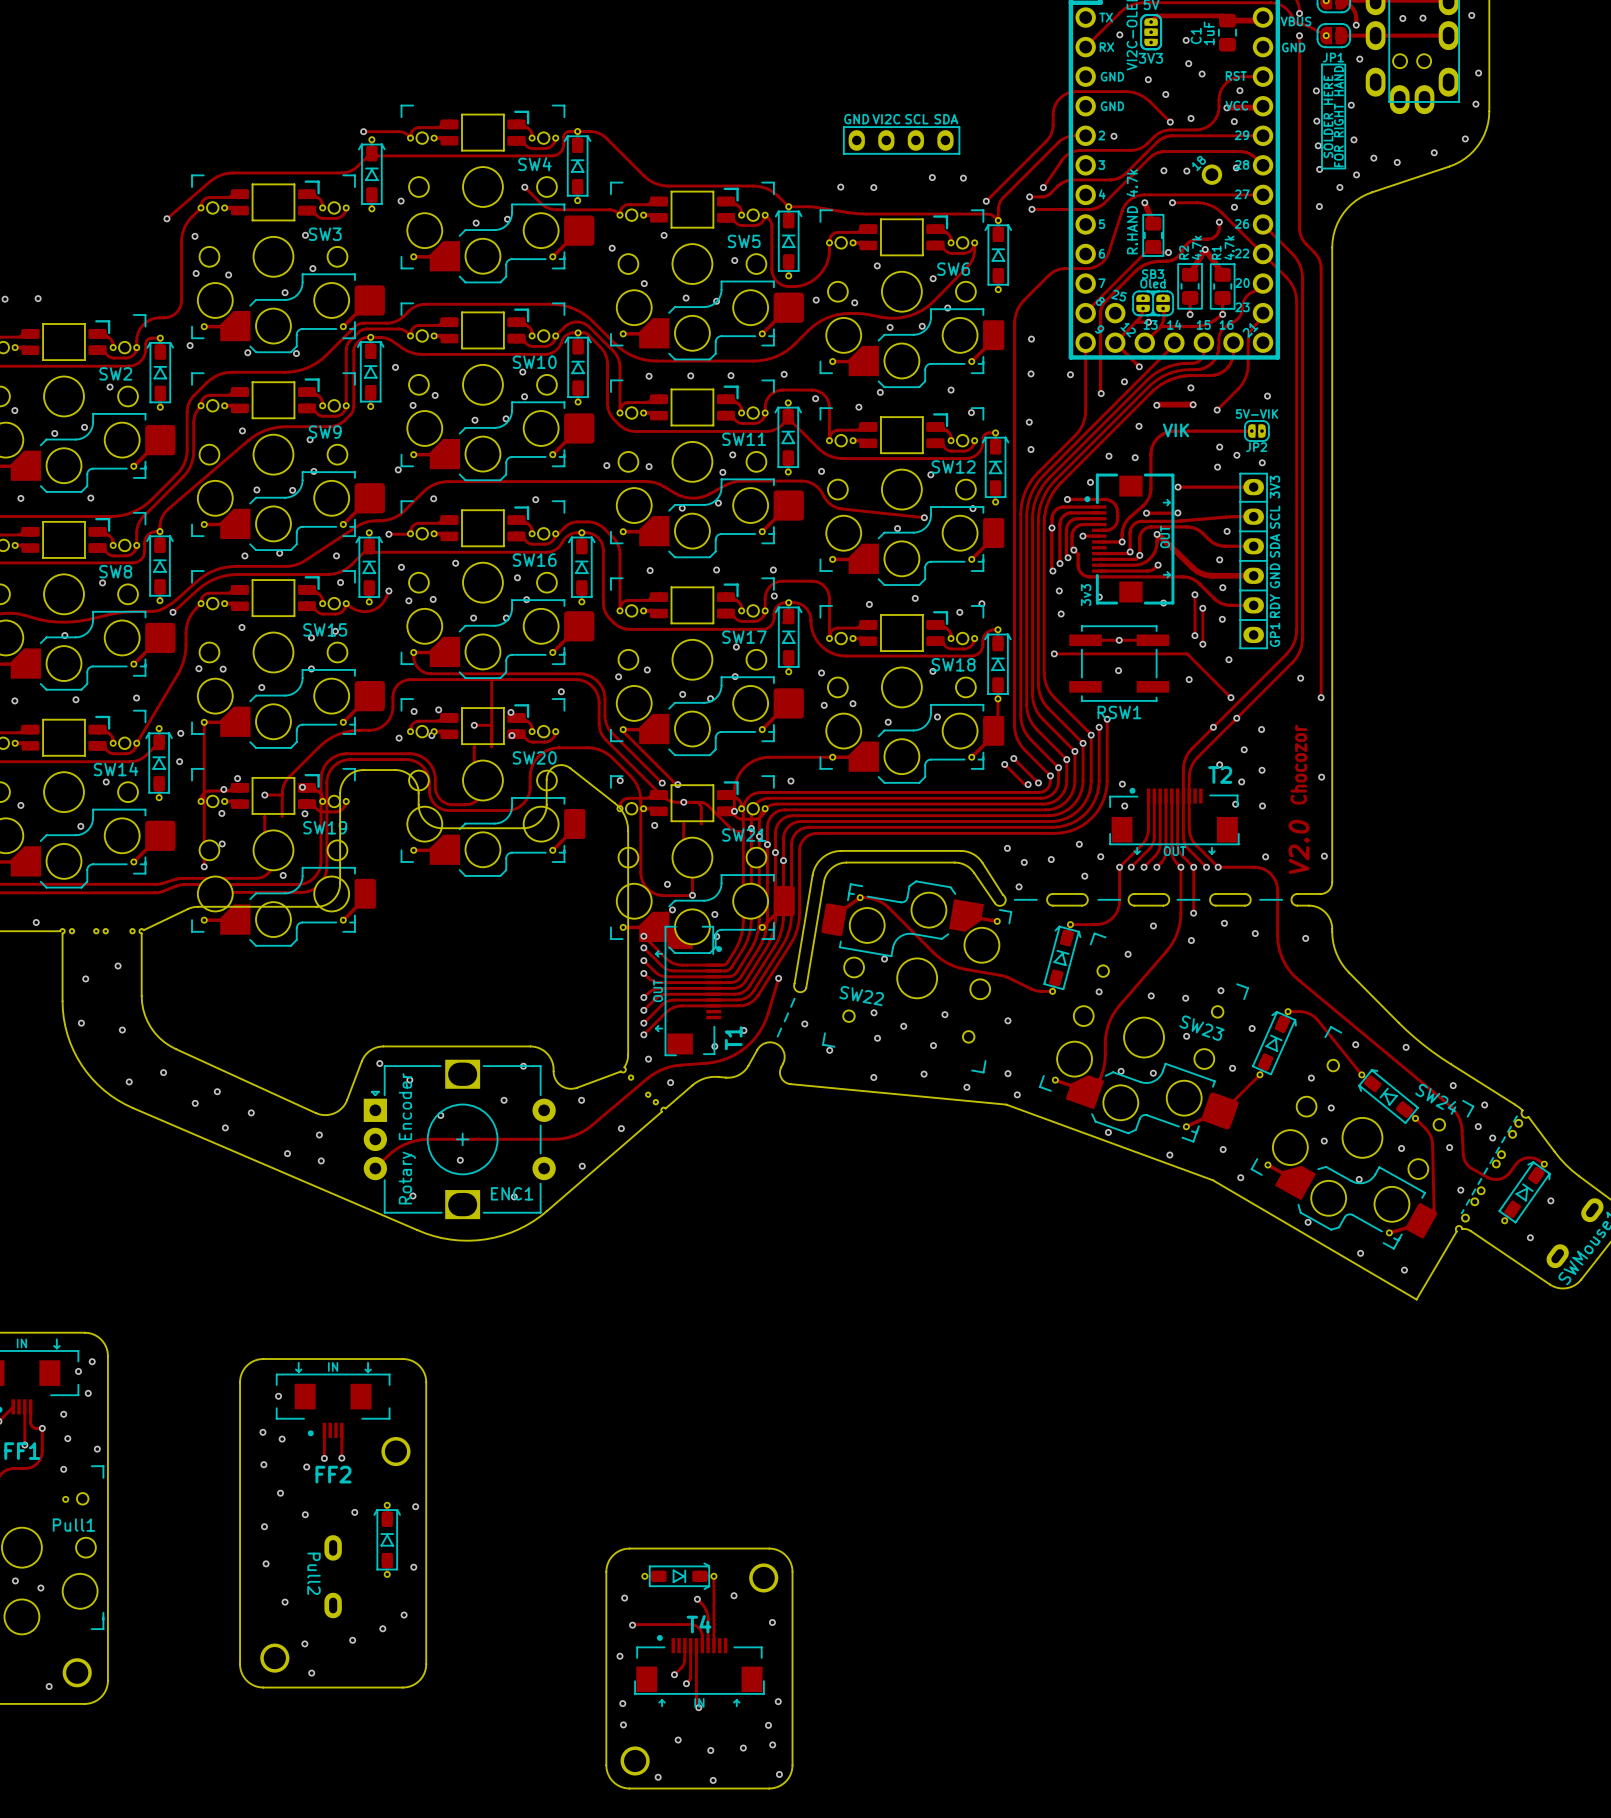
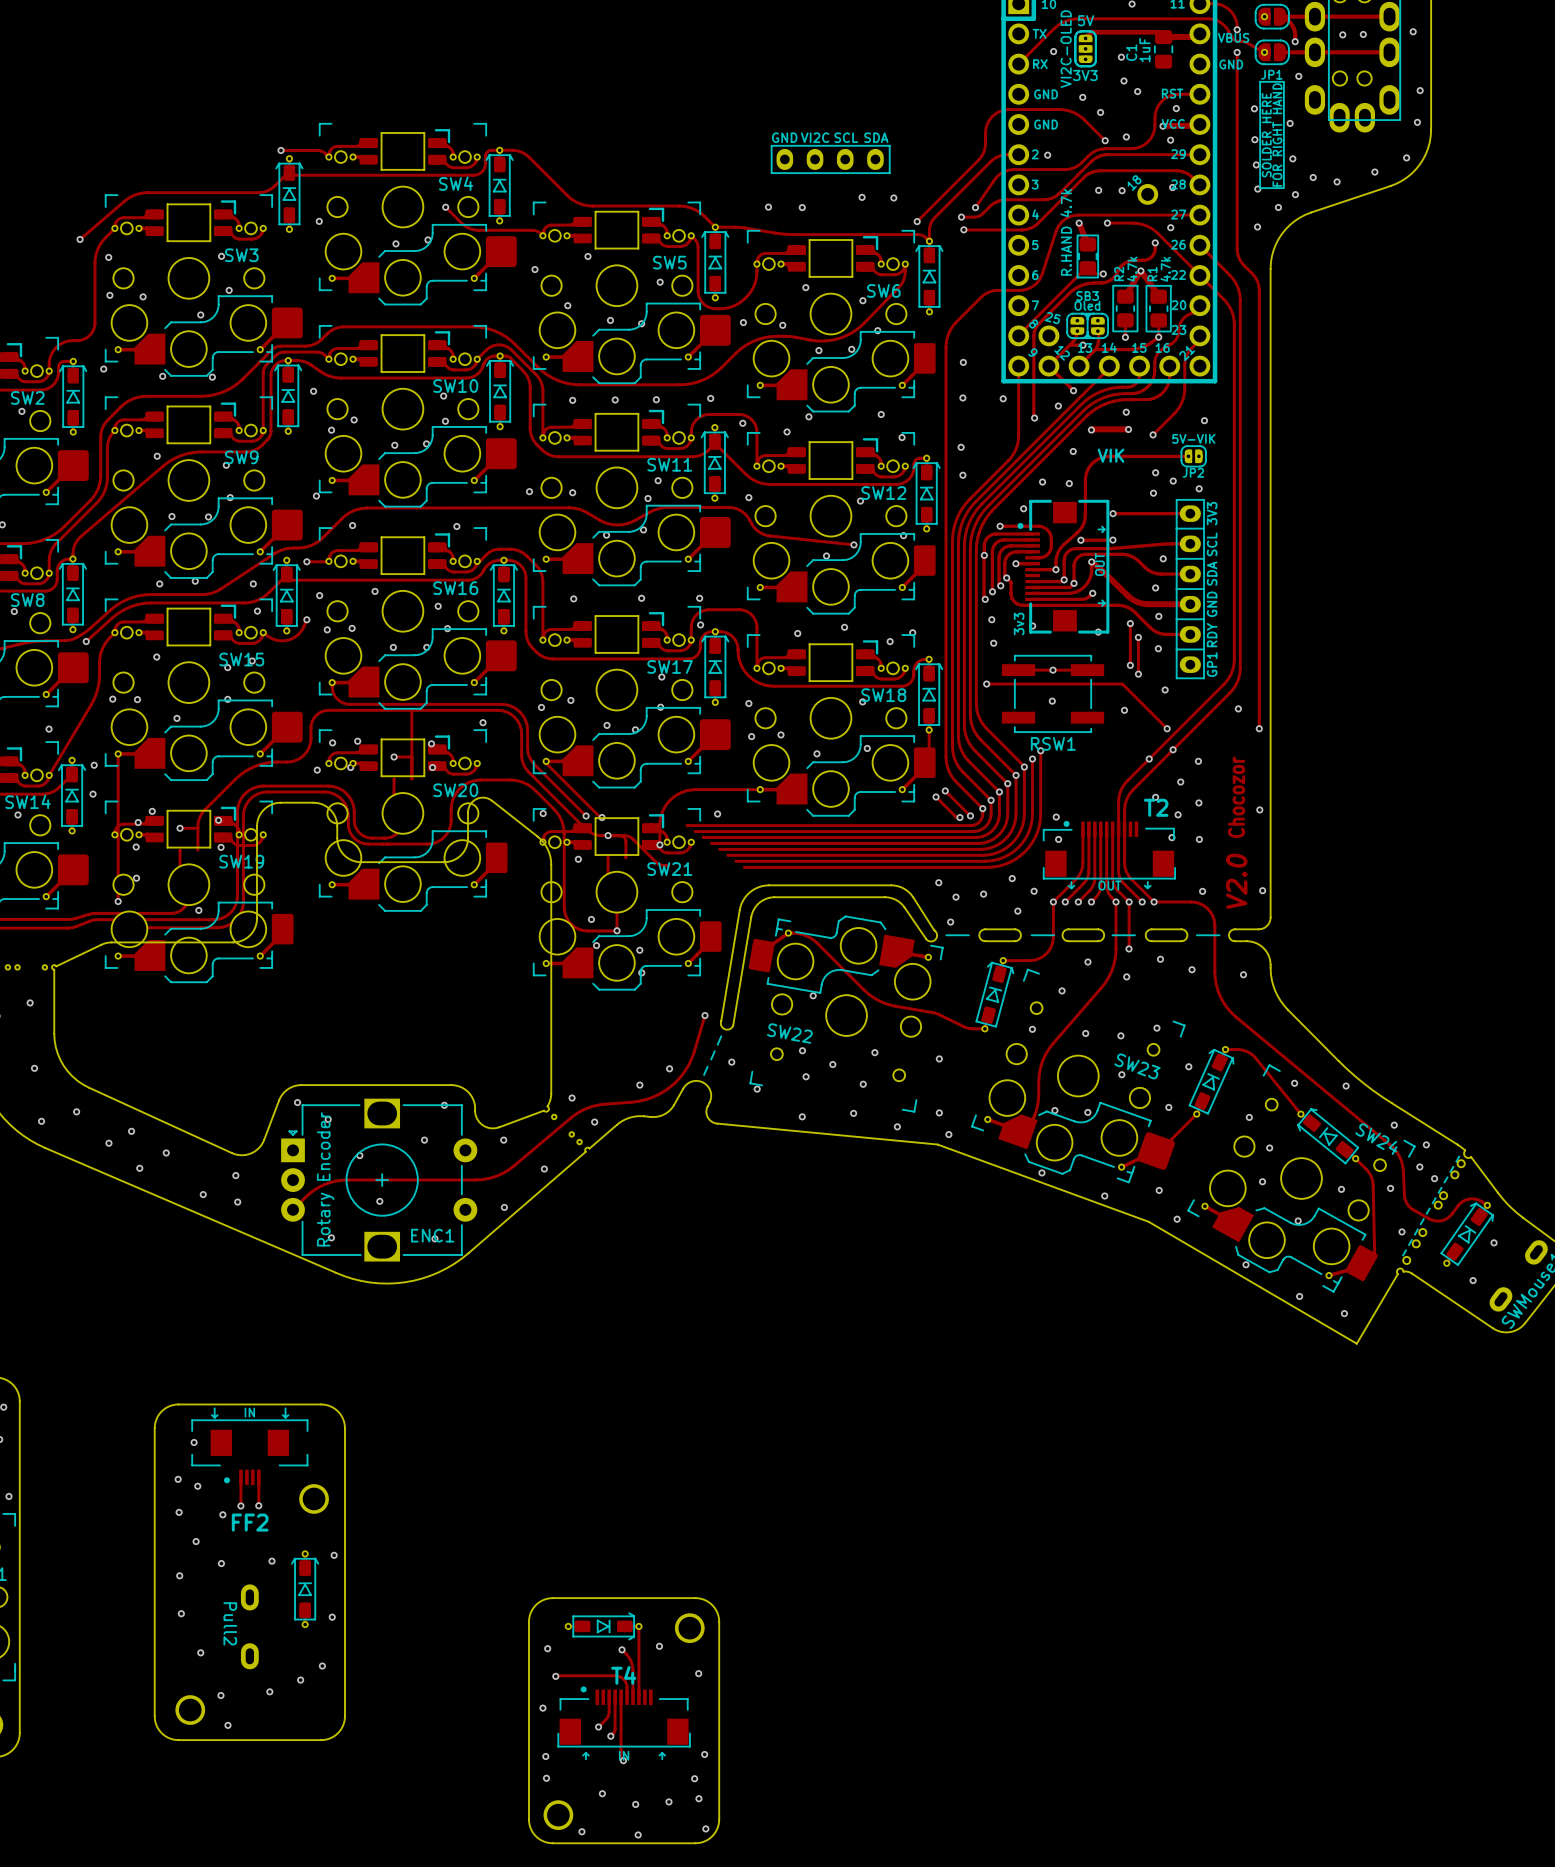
track: (760, 792) (750, 796) (743, 807) (743, 925) (739, 941) (727, 962) (722, 965) (676, 964) (668, 960) (643, 936) -> none
track: (768, 798) (758, 801) (751, 811) (751, 924) (745, 945) (731, 967) (724, 970) (669, 970) (663, 967) (643, 947) -> none
track: (776, 804) (768, 806) (761, 812) (759, 819) (759, 836) -> none
track: (784, 809) (774, 813) (768, 822) (766, 928) (761, 944) (740, 977) (730, 982) (660, 982) (651, 980) (643, 973) -> none
track: (792, 815) (780, 820) (775, 830) (775, 916) (773, 932) (766, 947) (744, 982) (734, 988) (657, 988) (651, 990) (643, 997) -> none
track: (800, 821) (790, 825) (783, 836) (783, 915) (781, 931) (774, 946) (748, 987) (737, 994) (662, 994) (656, 997) (643, 1010) -> none
track: (808, 827) (798, 830) (791, 842) (791, 914) (787, 935) (752, 992) (739, 999) (669, 1000) (663, 1003) (643, 1023) -> none
via: (751, 828) -> none
track: (817, 833) (806, 836) (800, 846) (799, 918) (795, 934) (756, 997) (749, 1003) (742, 1005) (676, 1006) (668, 1010) (643, 1034) -> none
track: (759, 836) (758, 930) (753, 945) (735, 973) (728, 976) (664, 976) (656, 973) (643, 960) -> none
via: (759, 836) -> none
via: (767, 844) -> none
via: (775, 852) -> none
via: (783, 860) -> none
via: (643, 936) -> none
via: (643, 947) -> none
via: (643, 960) -> none
via: (643, 973) -> none
T1: (688, 991) -> none
via: (643, 997) -> none
via: (643, 1010) -> none
via: (643, 1023) -> none
via: (643, 1034) -> none

